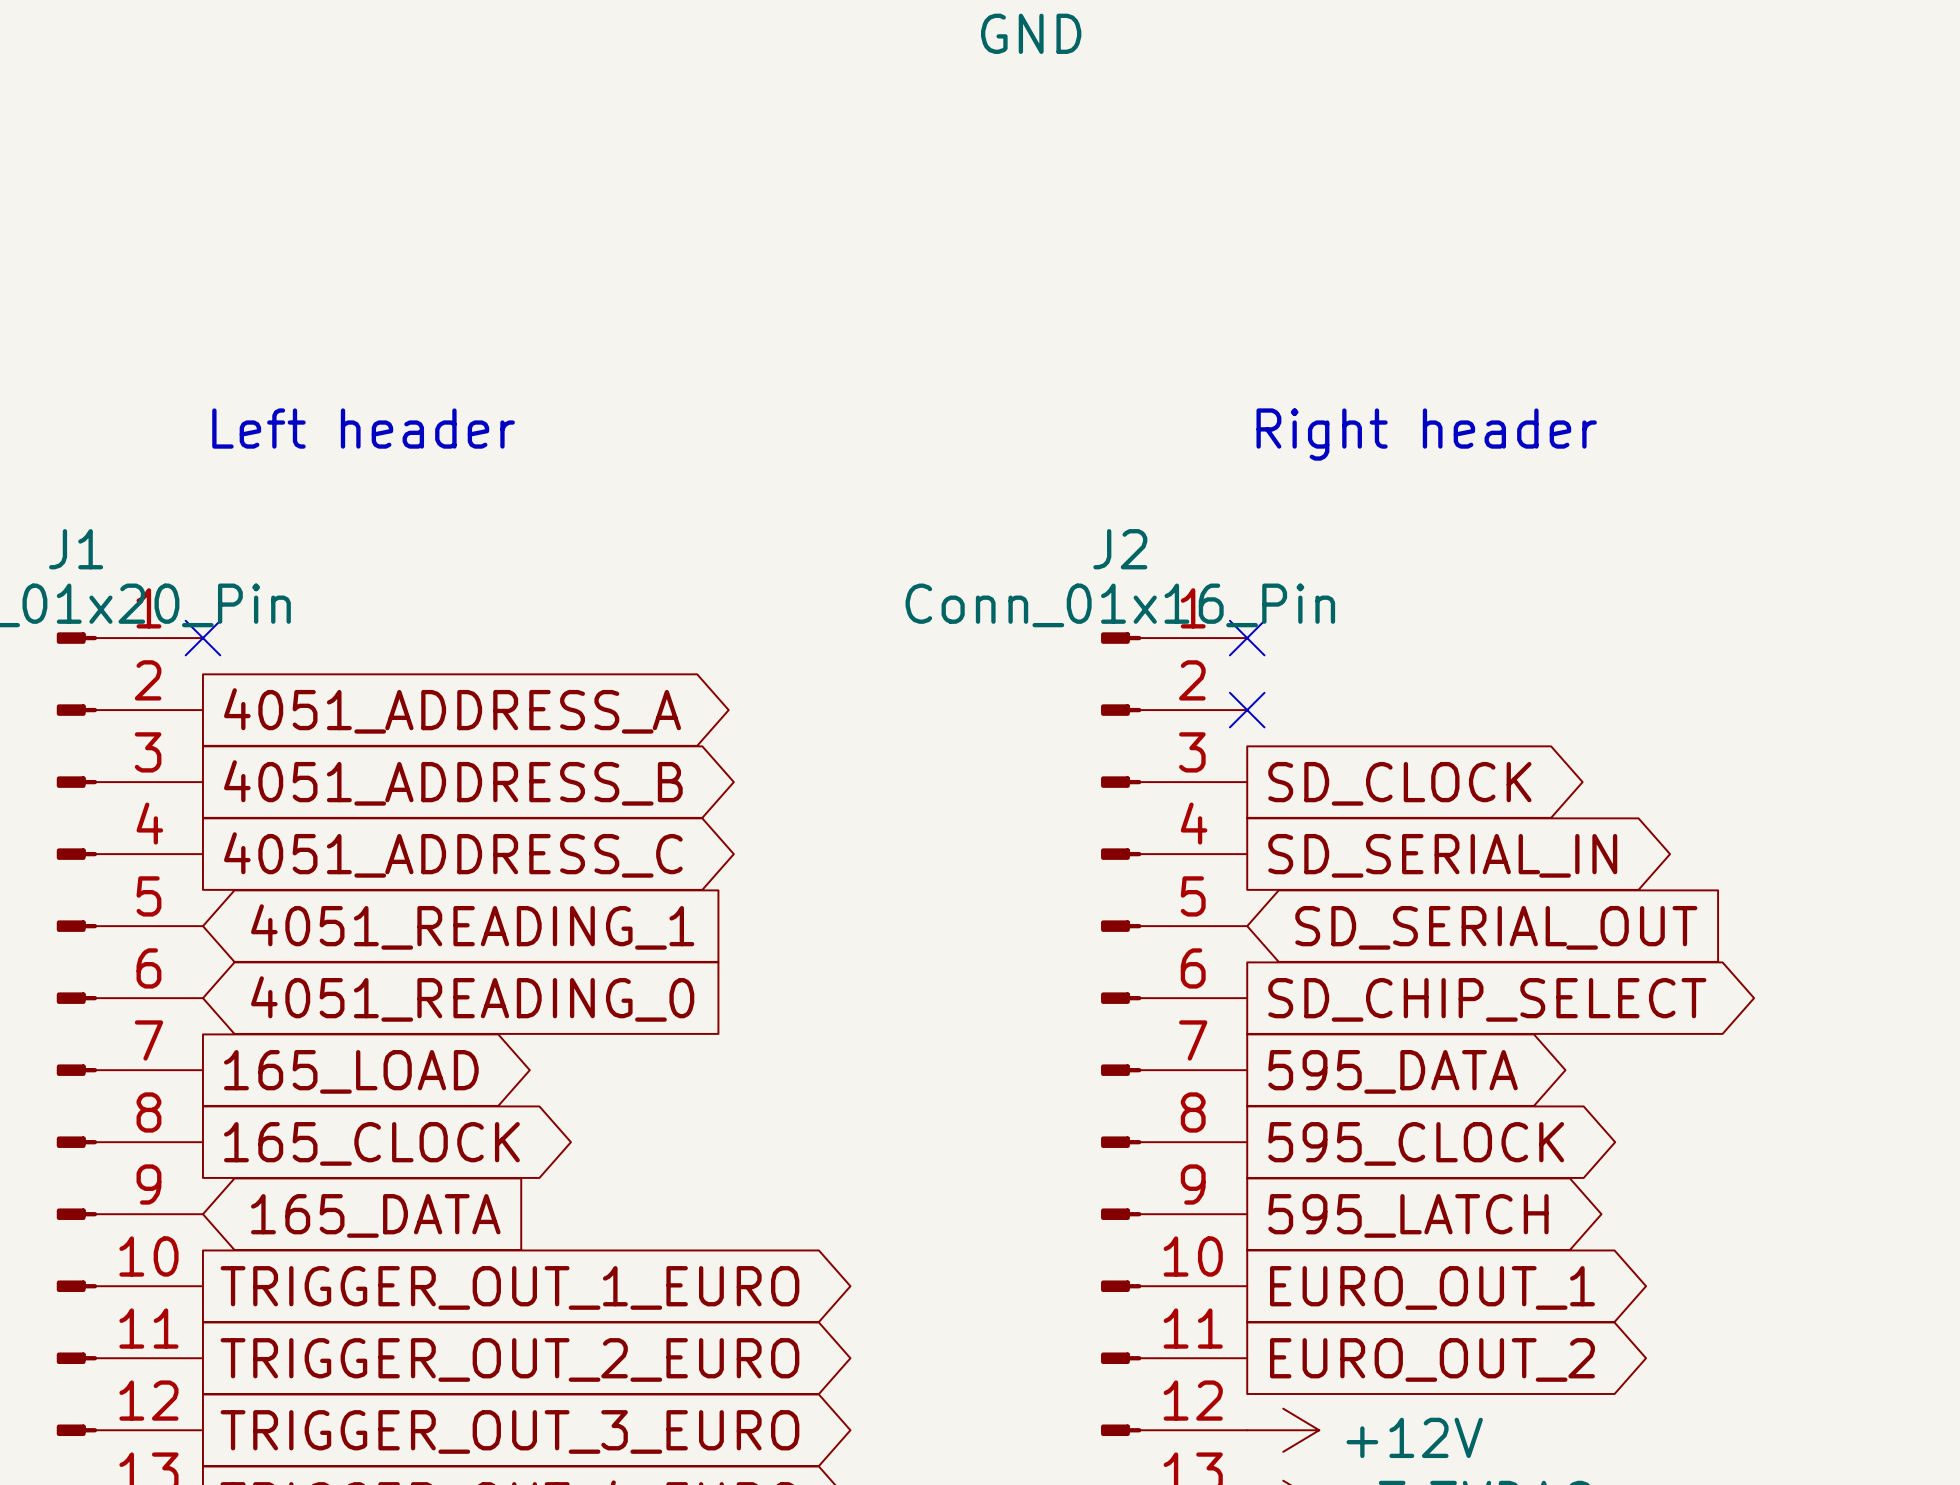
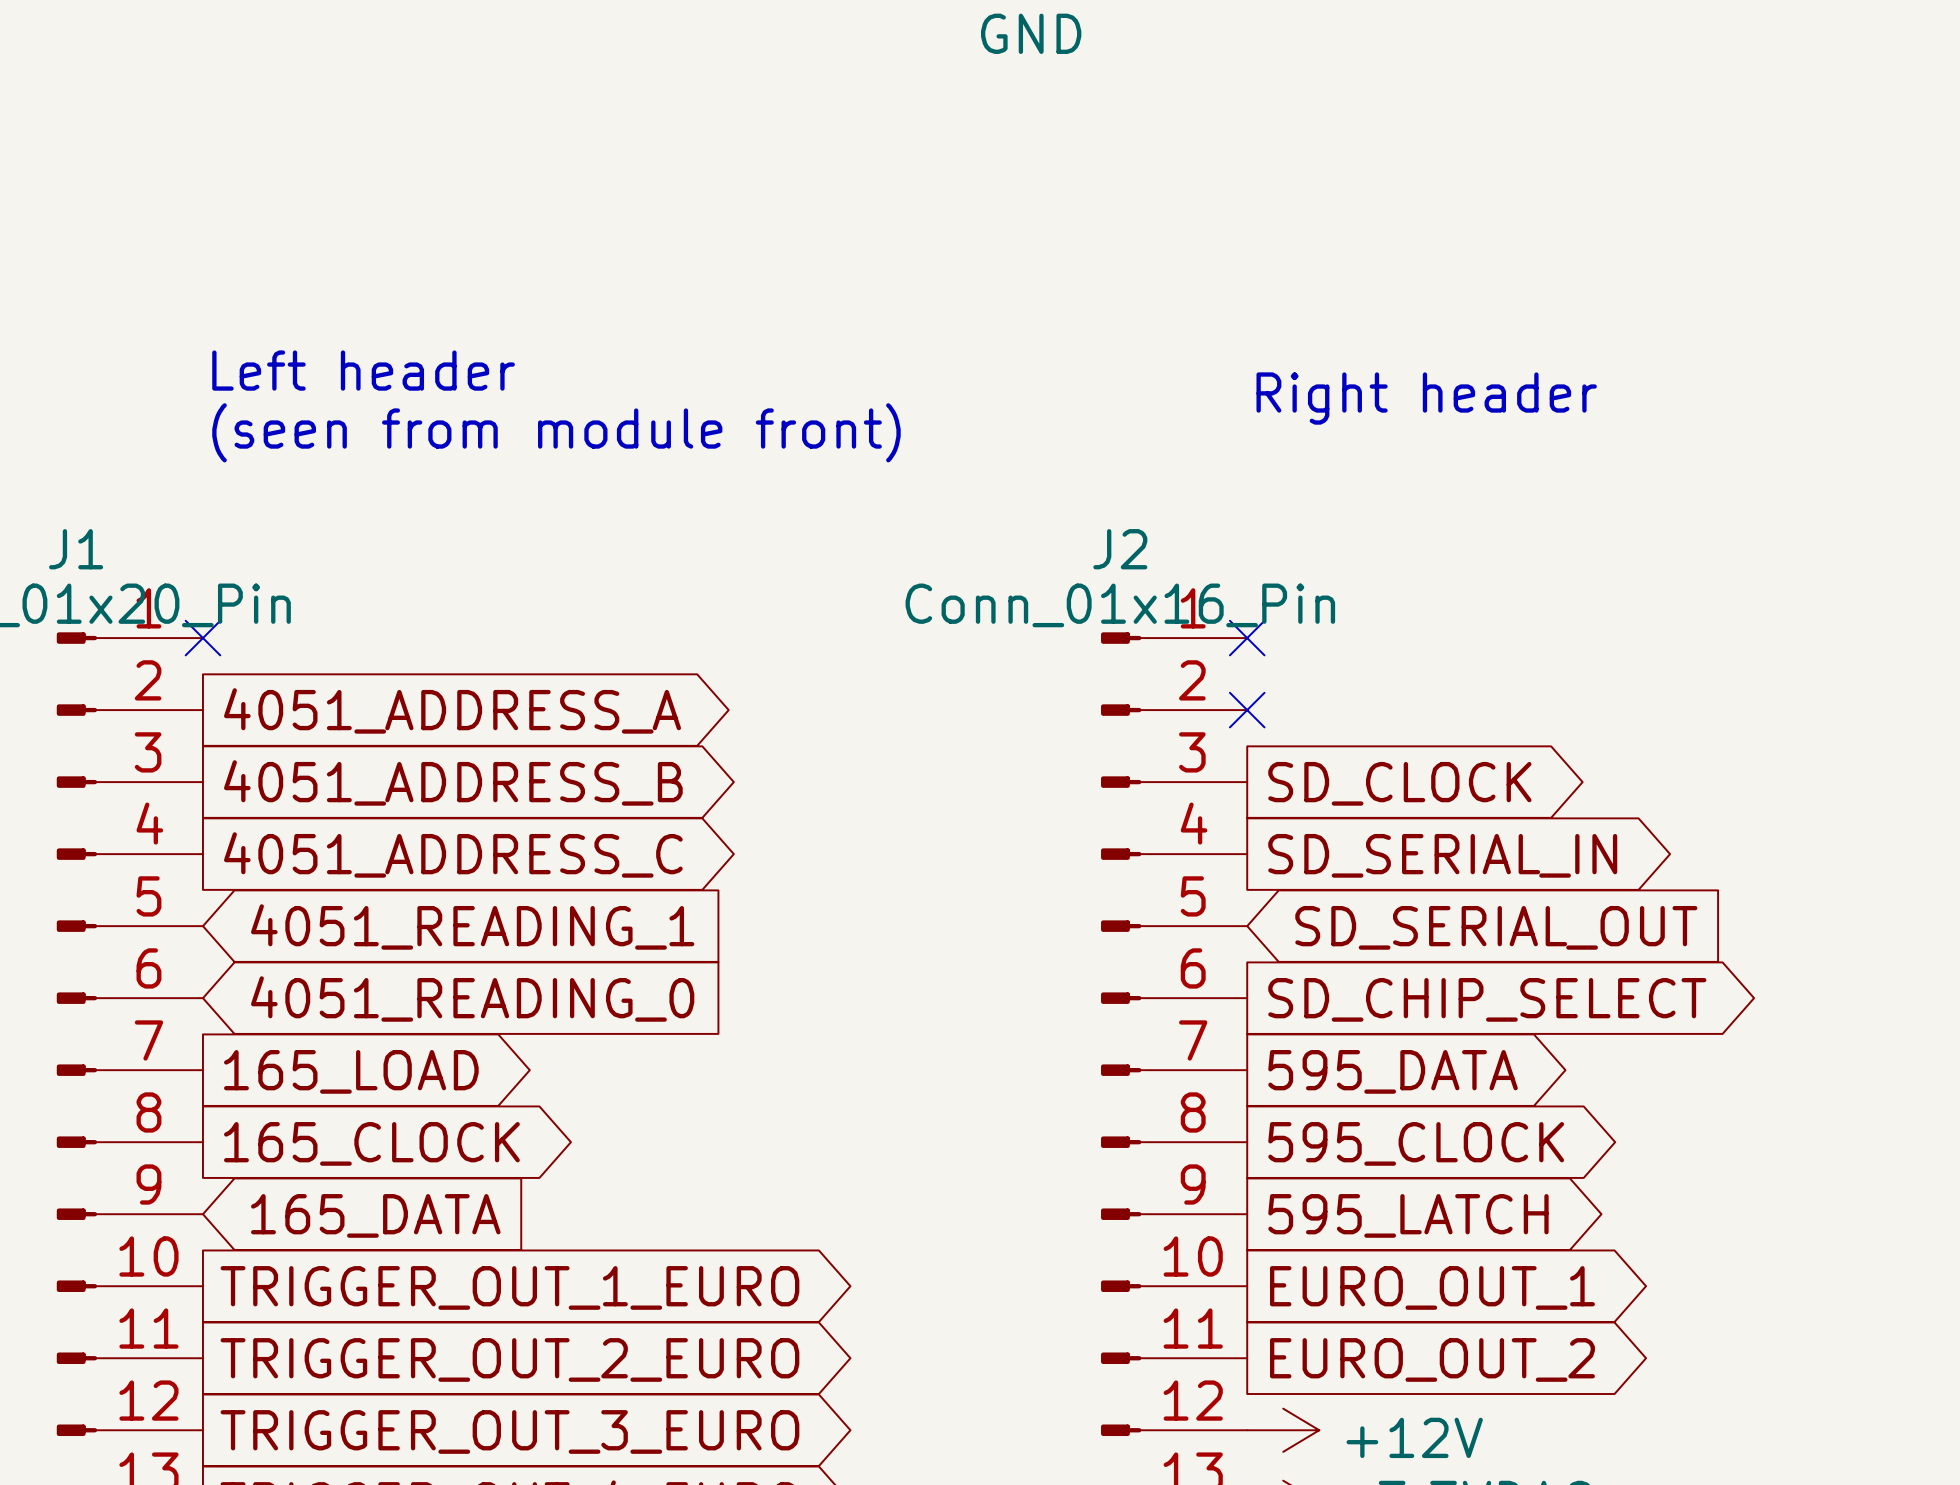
text: none -> Left header (363, 370)
text: Left header (363, 428) -> (seen from module front) (556, 432)
text position: Right header (1426, 434) -> Right header (1426, 398)

